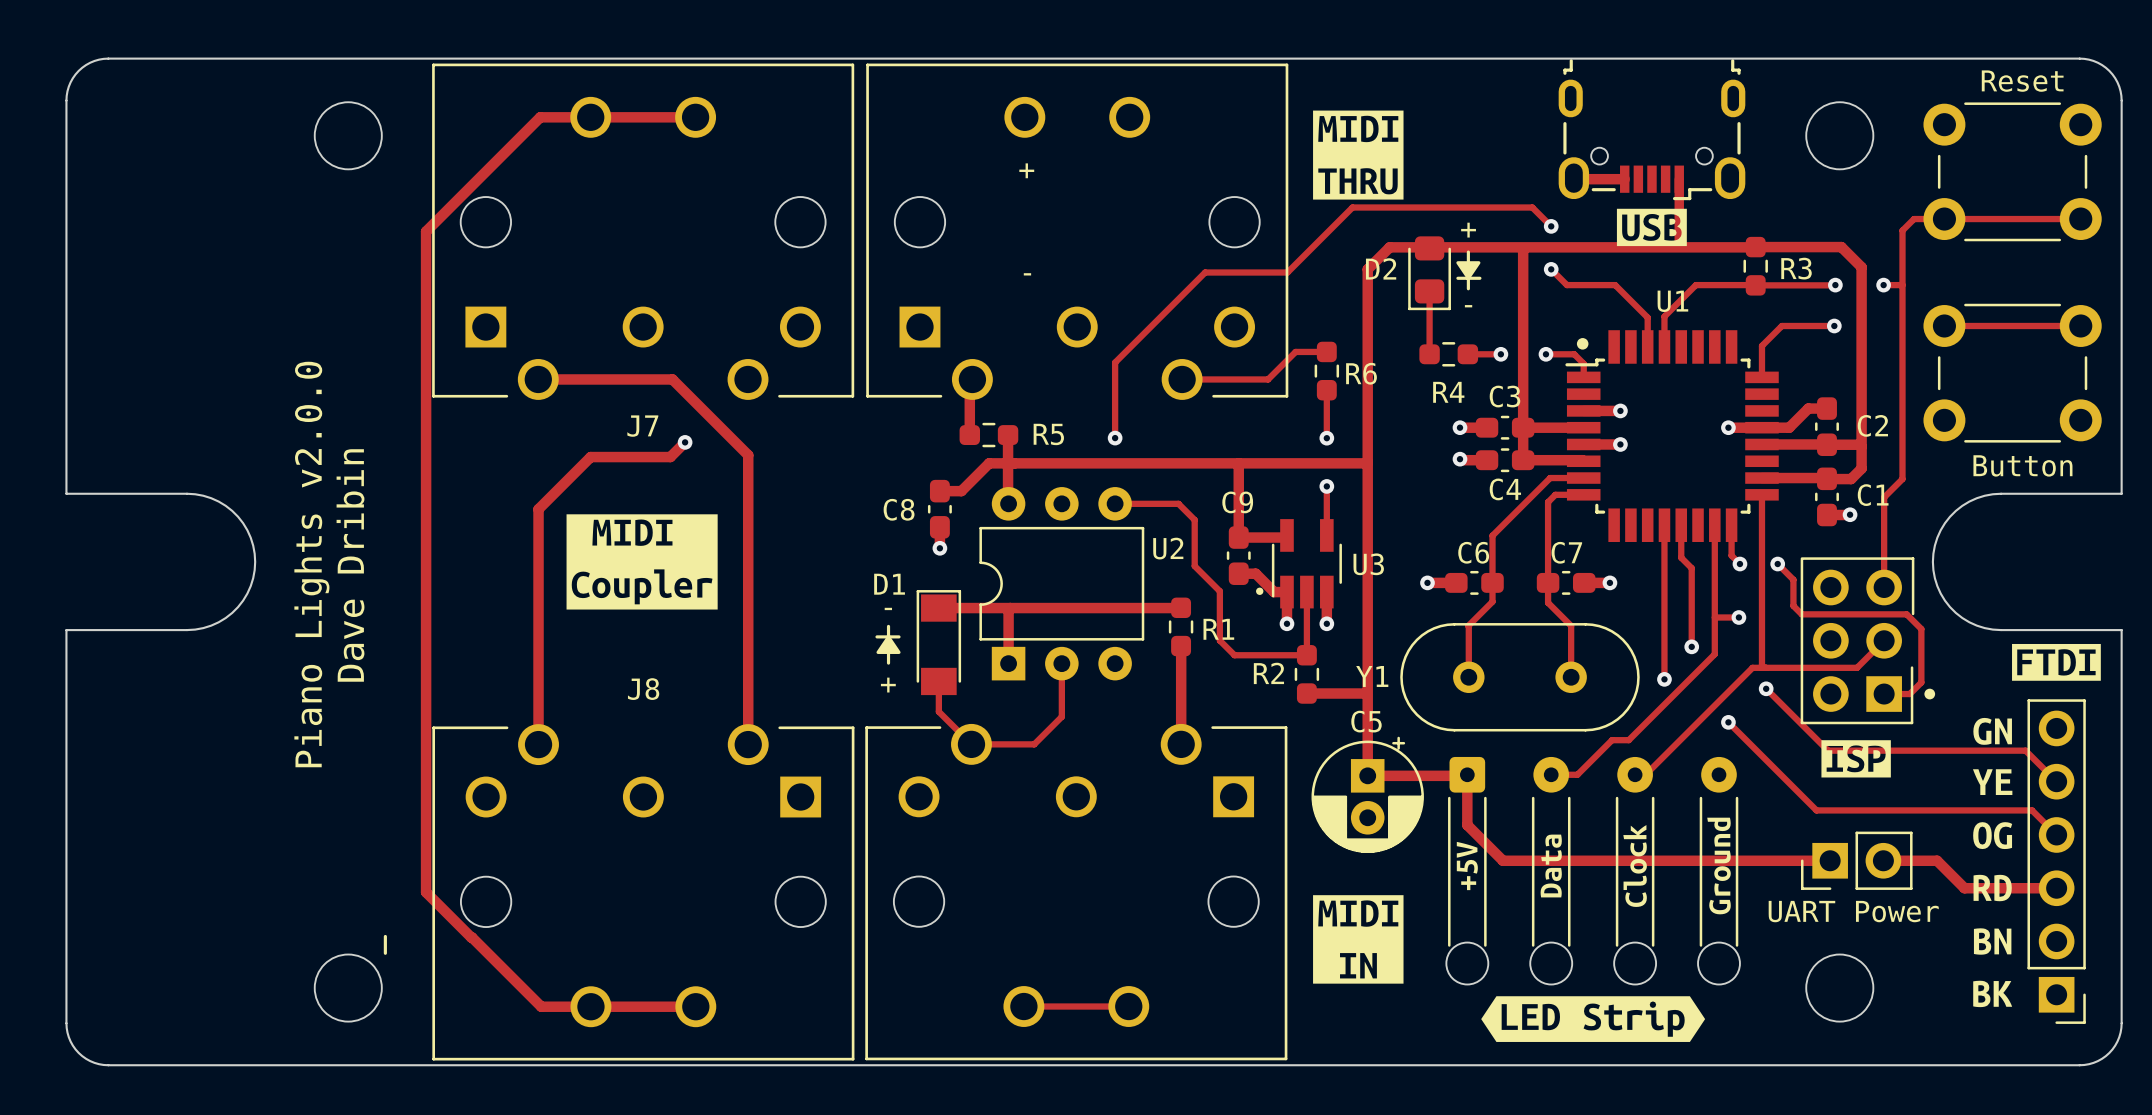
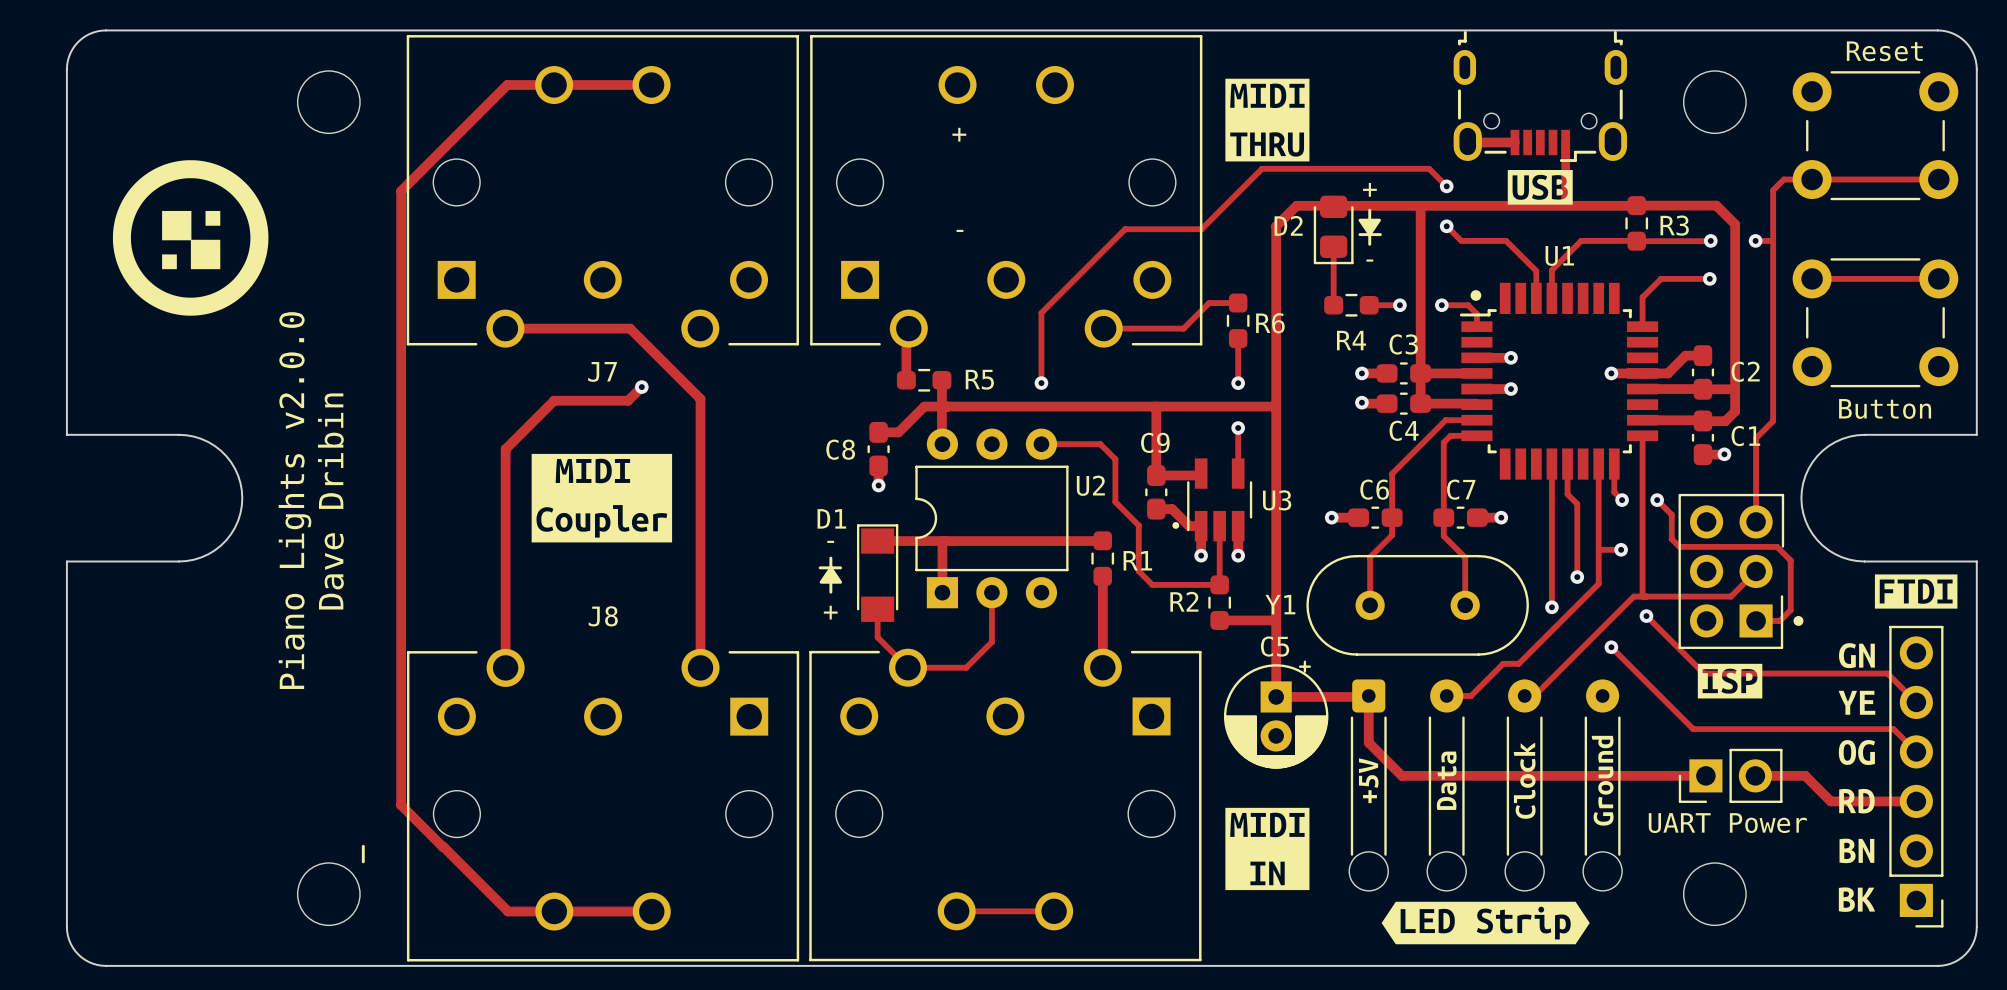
drawing: none -> [112, 160, 269, 316]

